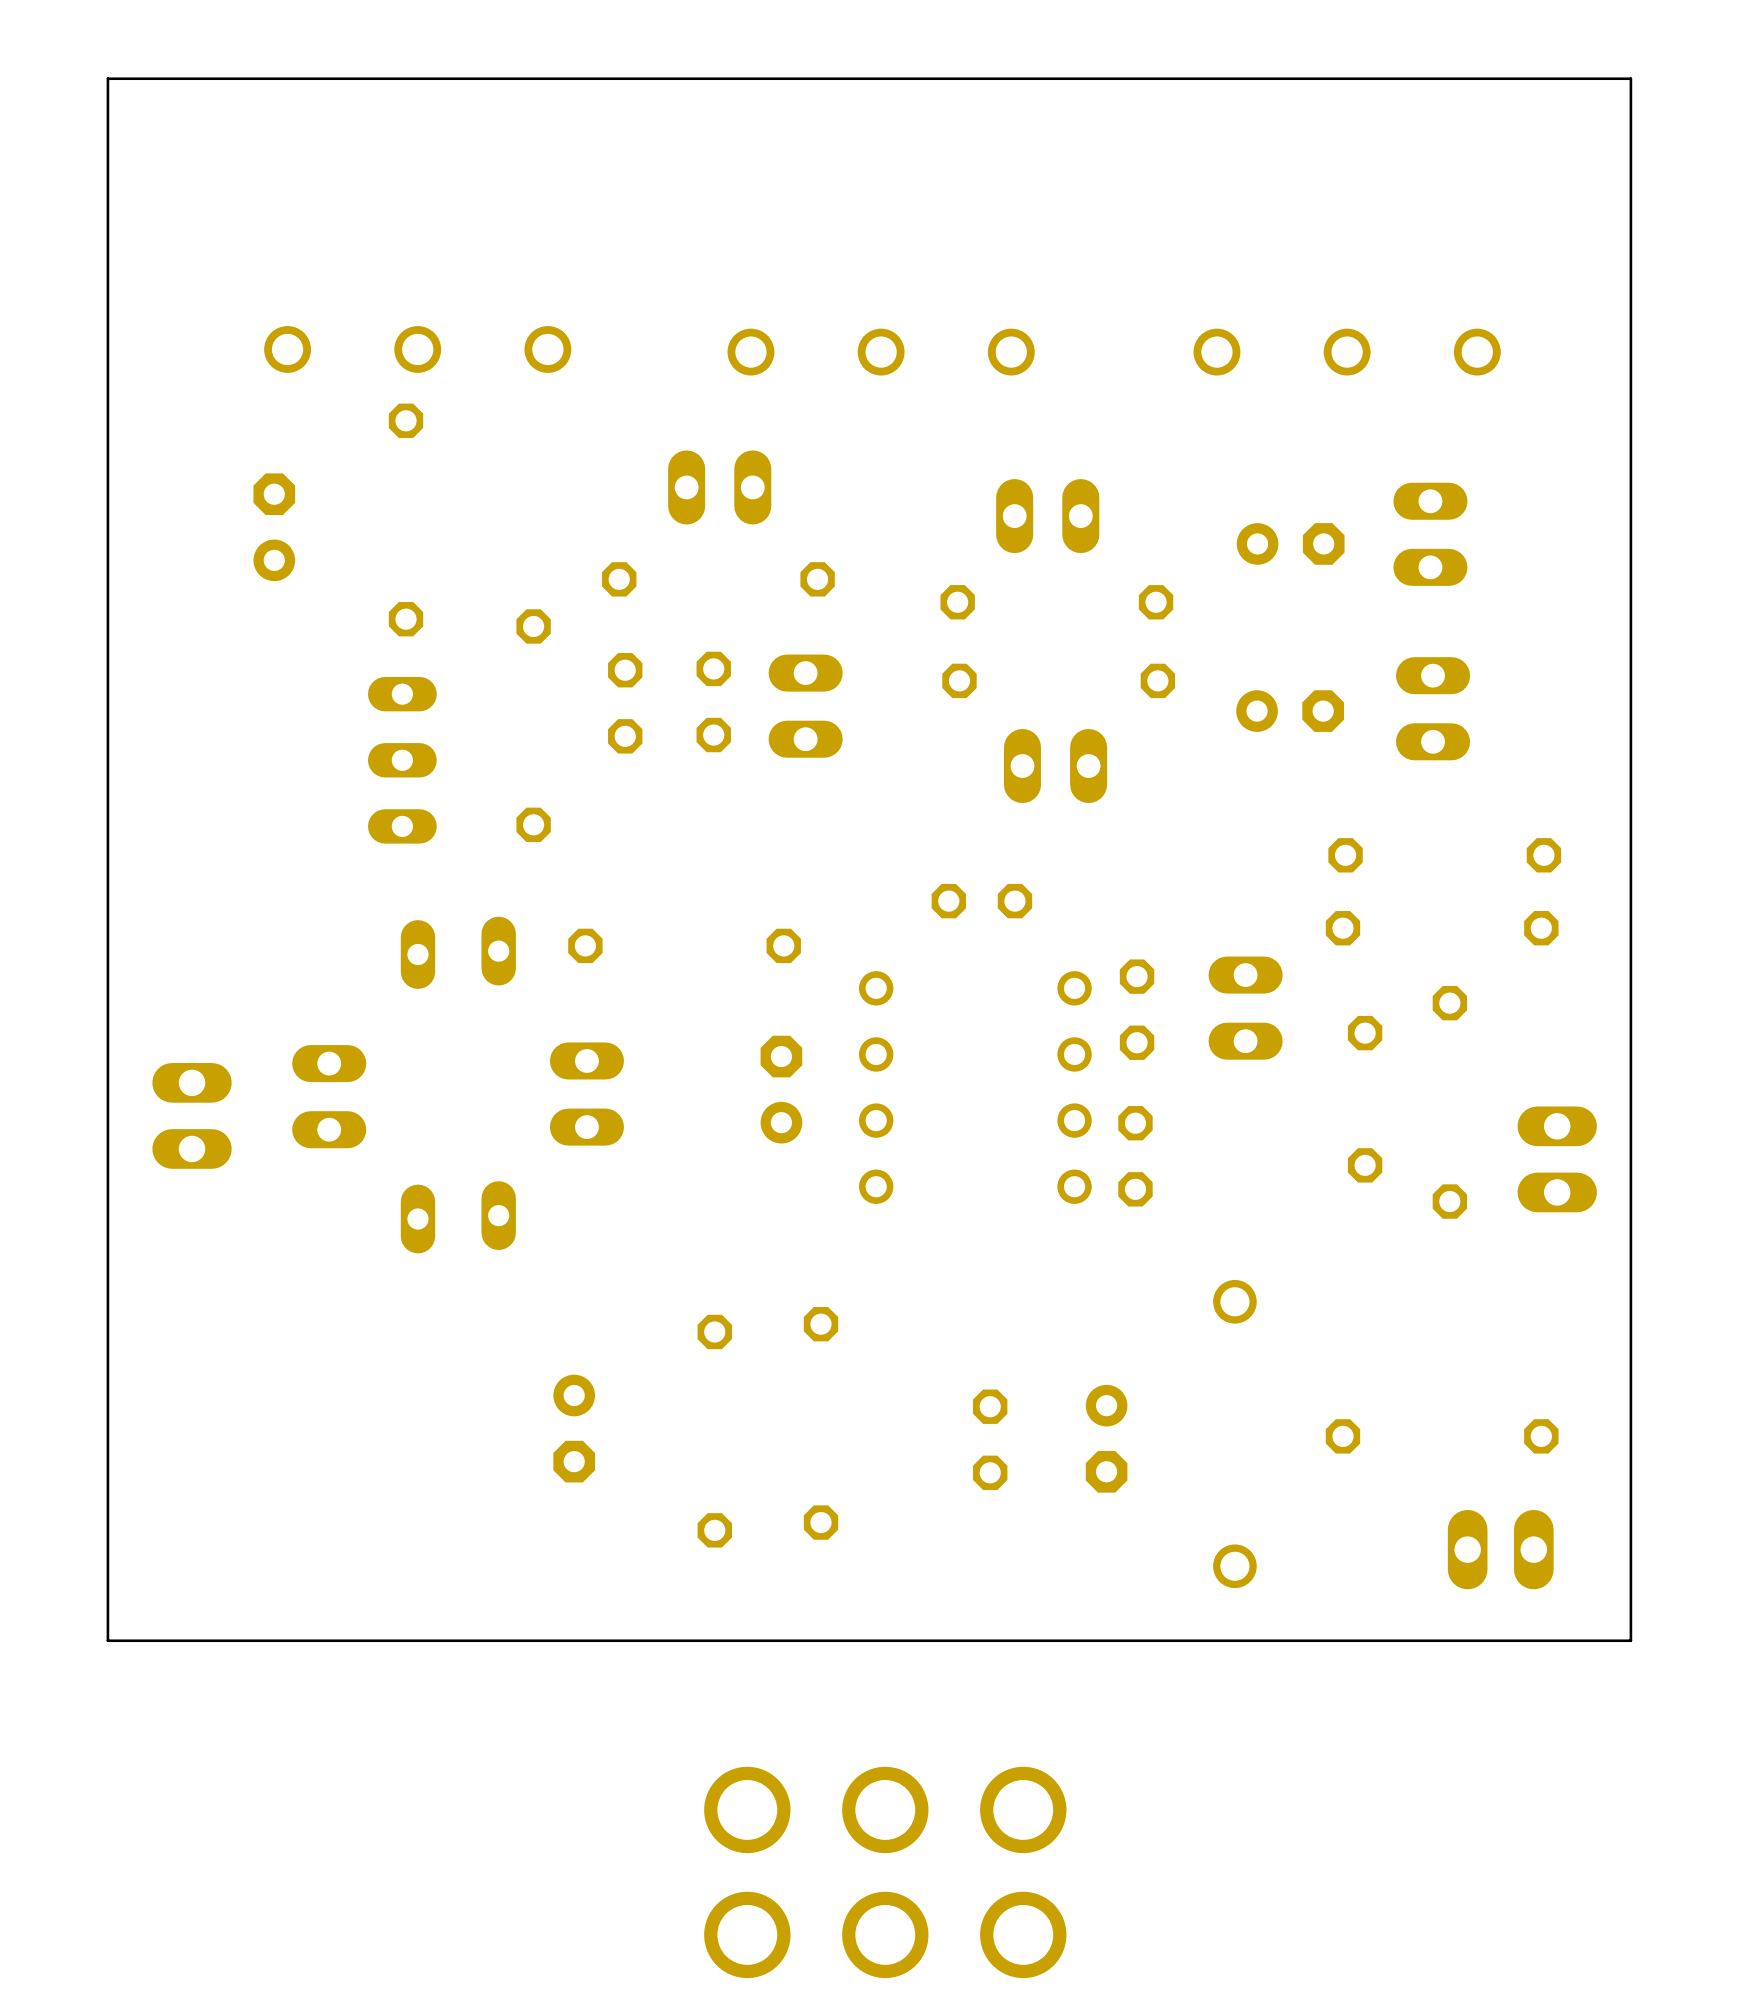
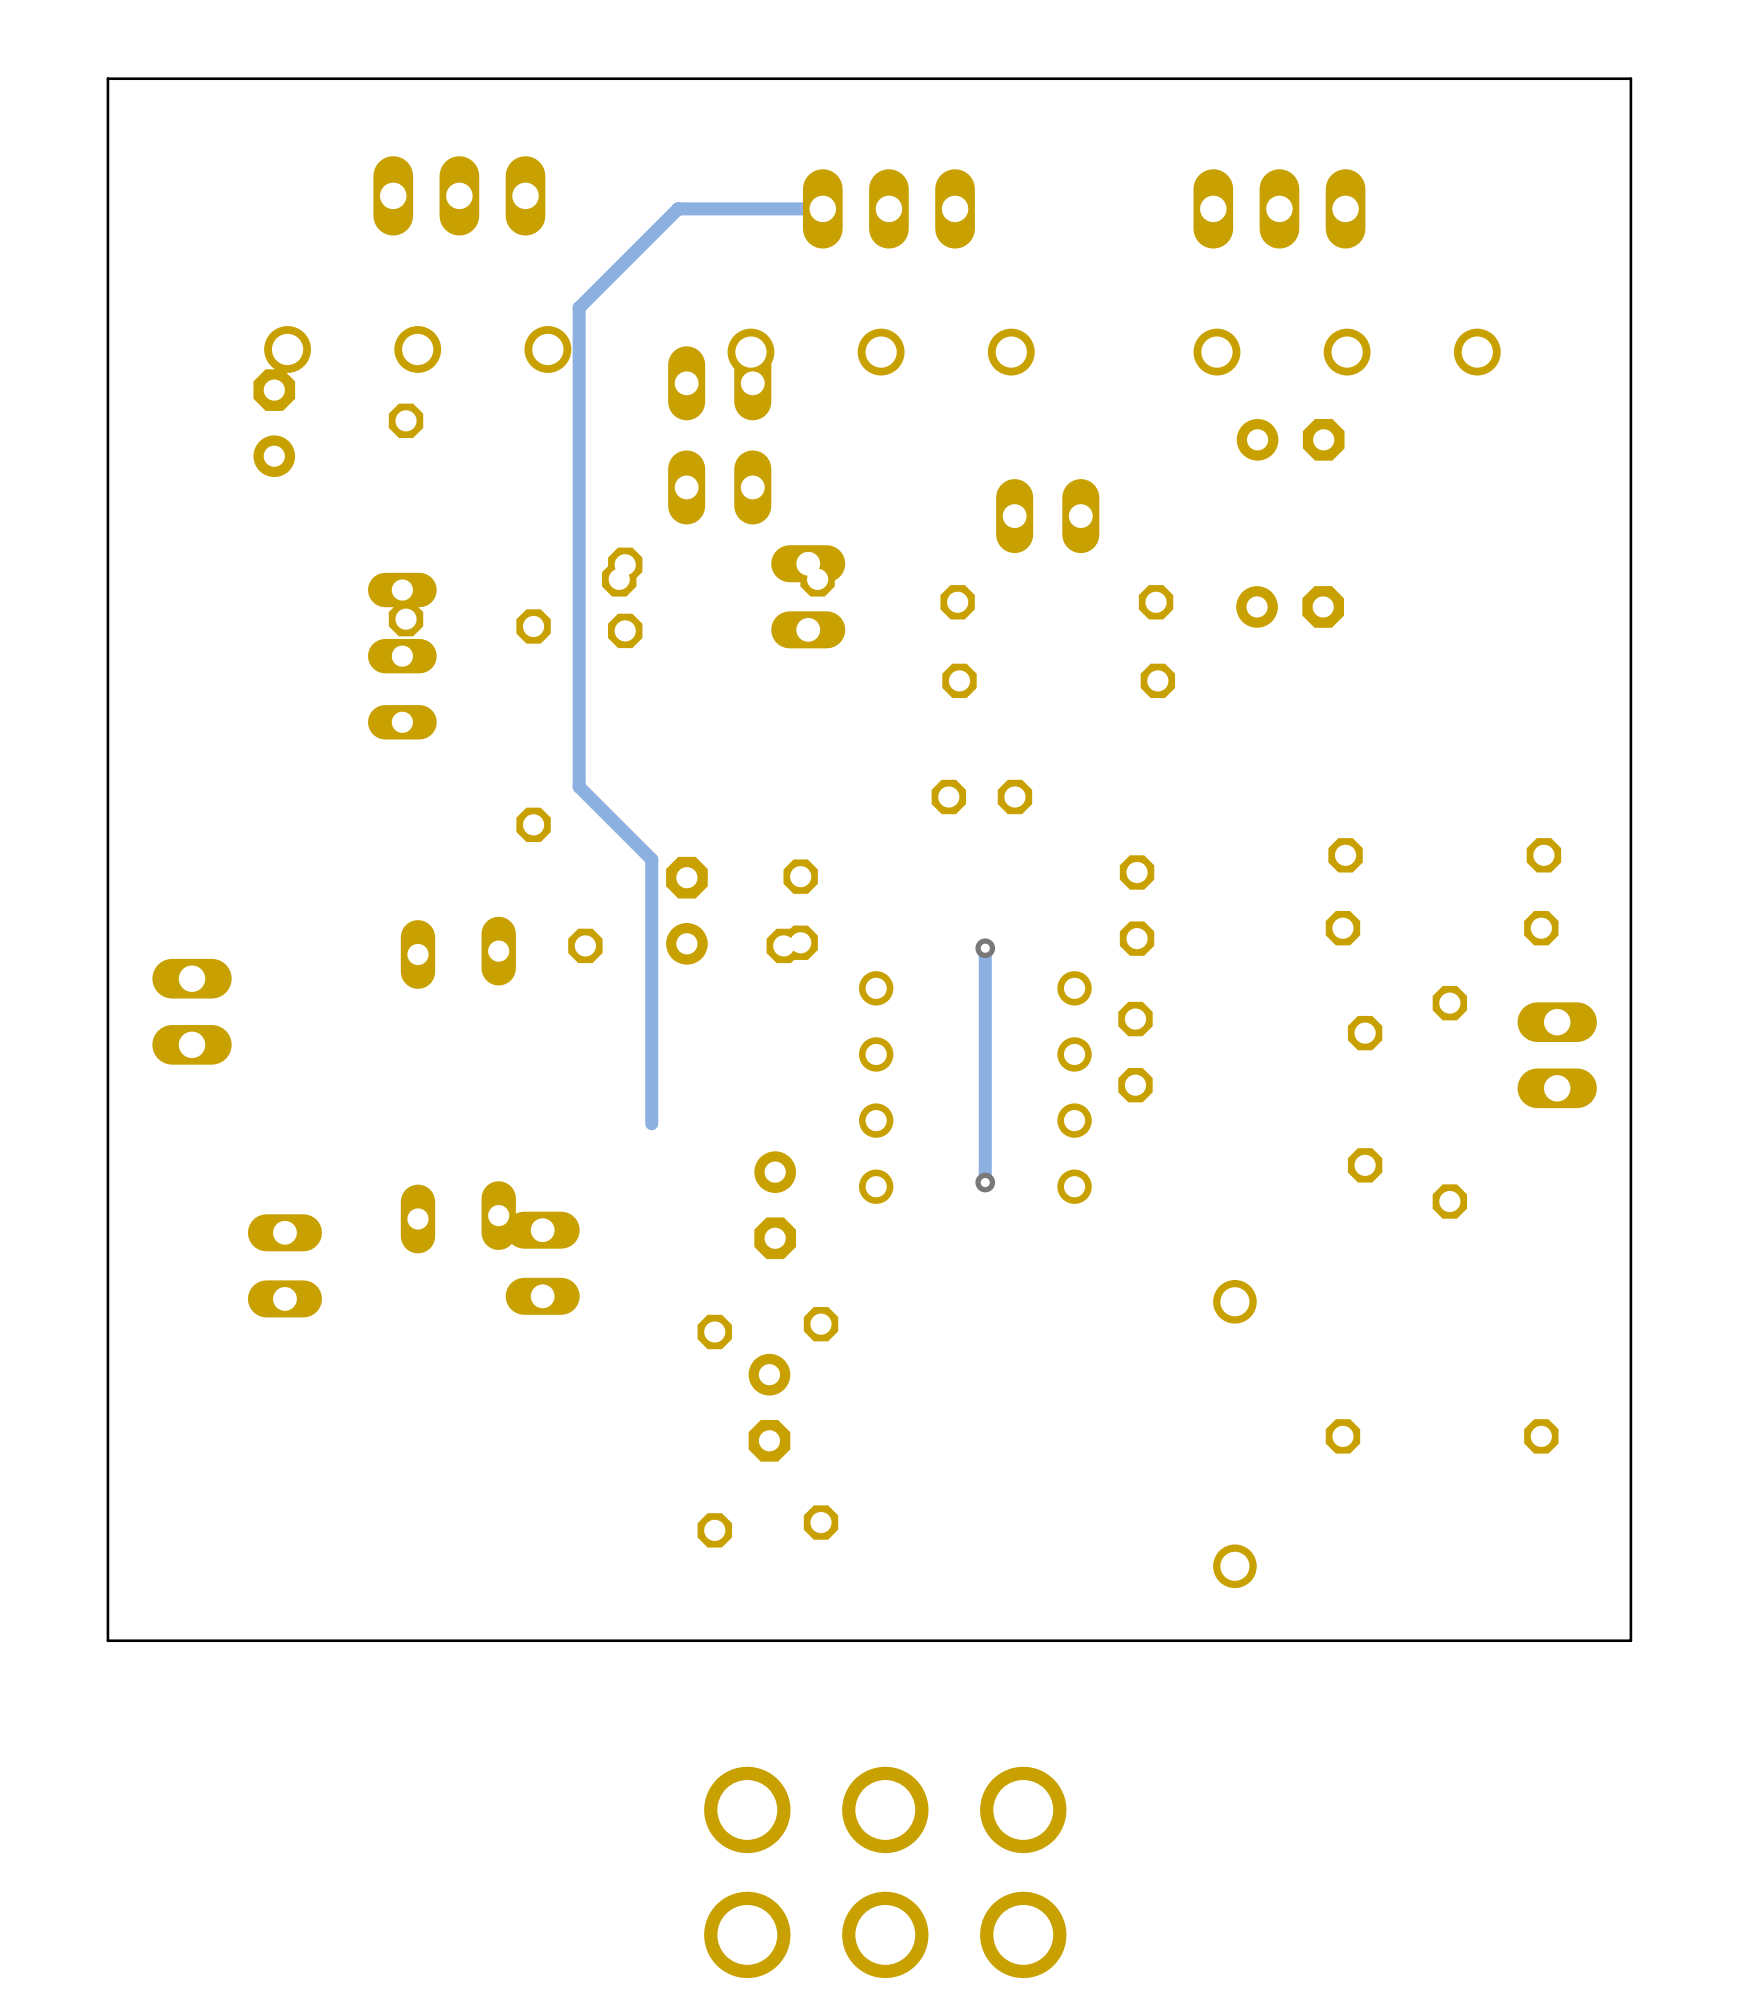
part: none -> (459, 195)
track: none -> (822, 208) (678, 208) (579, 307) (579, 786) (651, 859) (651, 1123)
part: none -> (888, 208)
part: none -> (1279, 208)
part: none -> (719, 383)
part: none -> (1290, 439)
part position: (274, 527) -> (274, 423)
part: (1430, 534) -> none
part: (1290, 543) -> none
part: none -> (625, 597)
part: none -> (1290, 606)
part: (713, 701) -> none
part: (625, 703) -> none
part position: (805, 706) -> (808, 596)
part: (1433, 708) -> none
part: (1290, 711) -> none
part position: (402, 760) -> (402, 656)
part: (1055, 766) -> none
part: none -> (981, 796)
part: (981, 901) -> none
part: none -> (1137, 905)
part: none -> (800, 909)
part: none -> (686, 910)
track: none -> (985, 948) (985, 1182)
via: none -> (985, 948)
part: (1245, 1008) -> none
part position: (1137, 1009) -> (1135, 1052)
part: (781, 1089) -> none
part: (586, 1094) -> none
part: (329, 1096) -> none
part position: (192, 1115) -> (192, 1011)
part: (1135, 1156) -> none
part position: (1557, 1159) -> (1557, 1055)
via: none -> (985, 1182)
part: none -> (775, 1205)
part: none -> (542, 1263)
part: none -> (284, 1265)
part: none -> (769, 1407)
part: (574, 1428) -> none
part: (1106, 1438) -> none
part: (990, 1439) -> none
part: (1500, 1549) -> none

